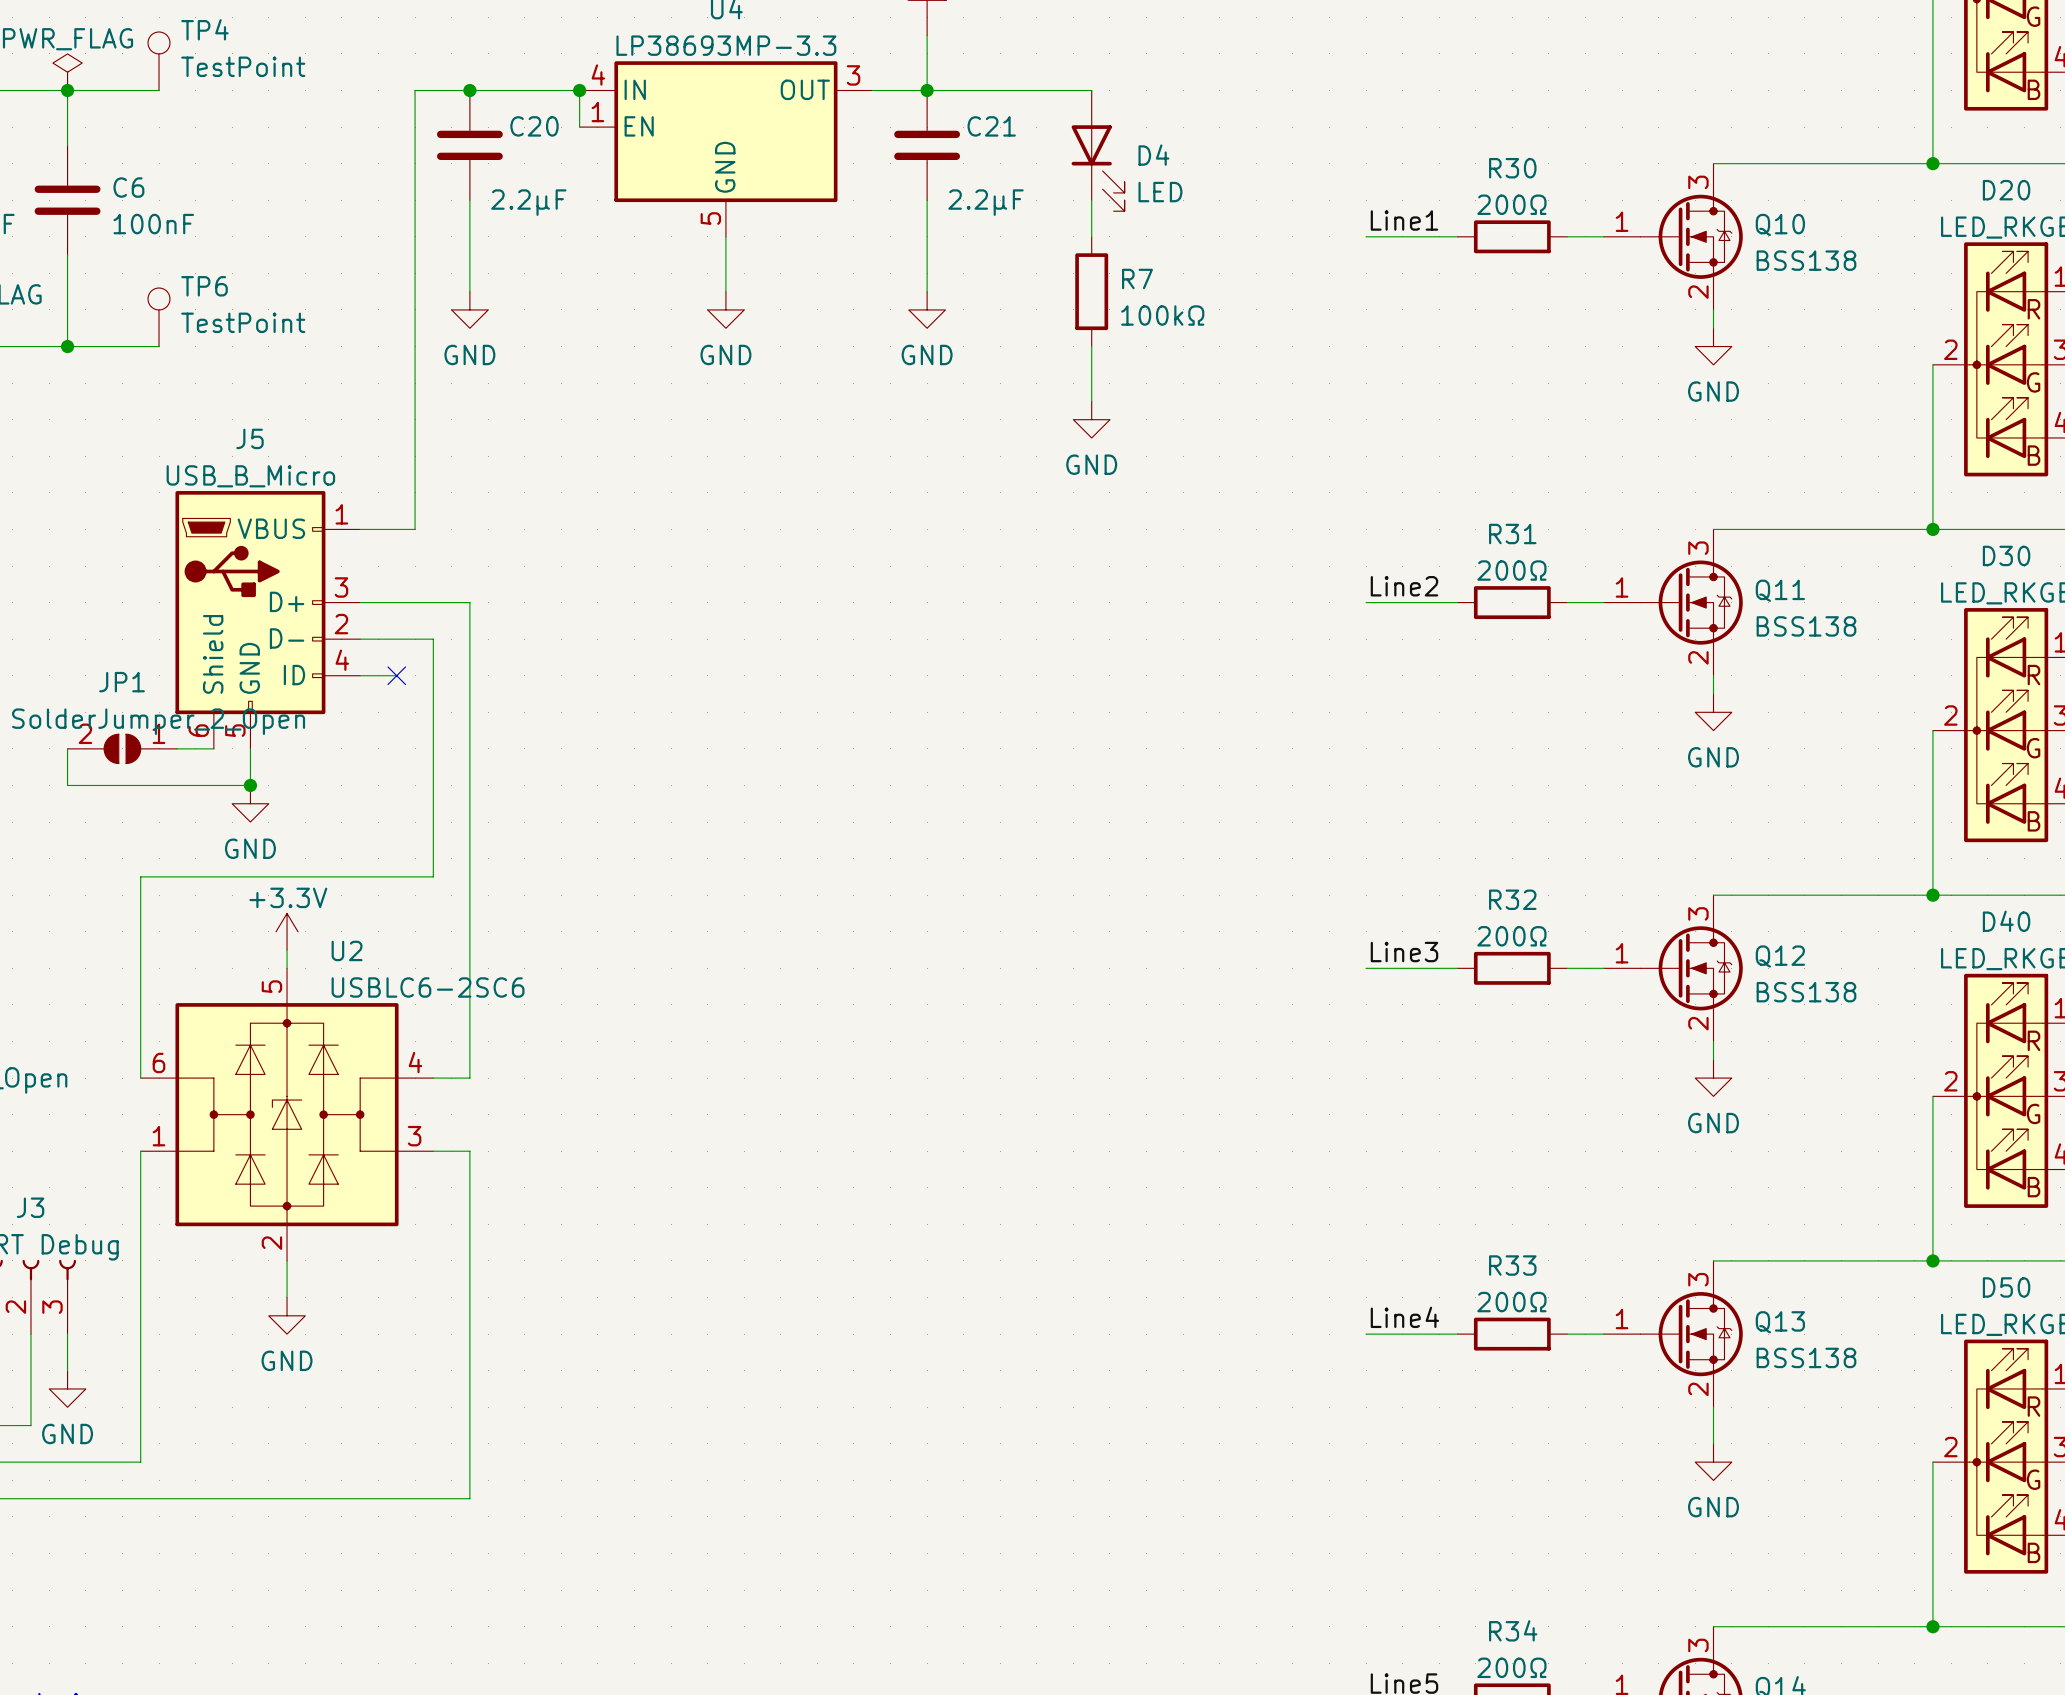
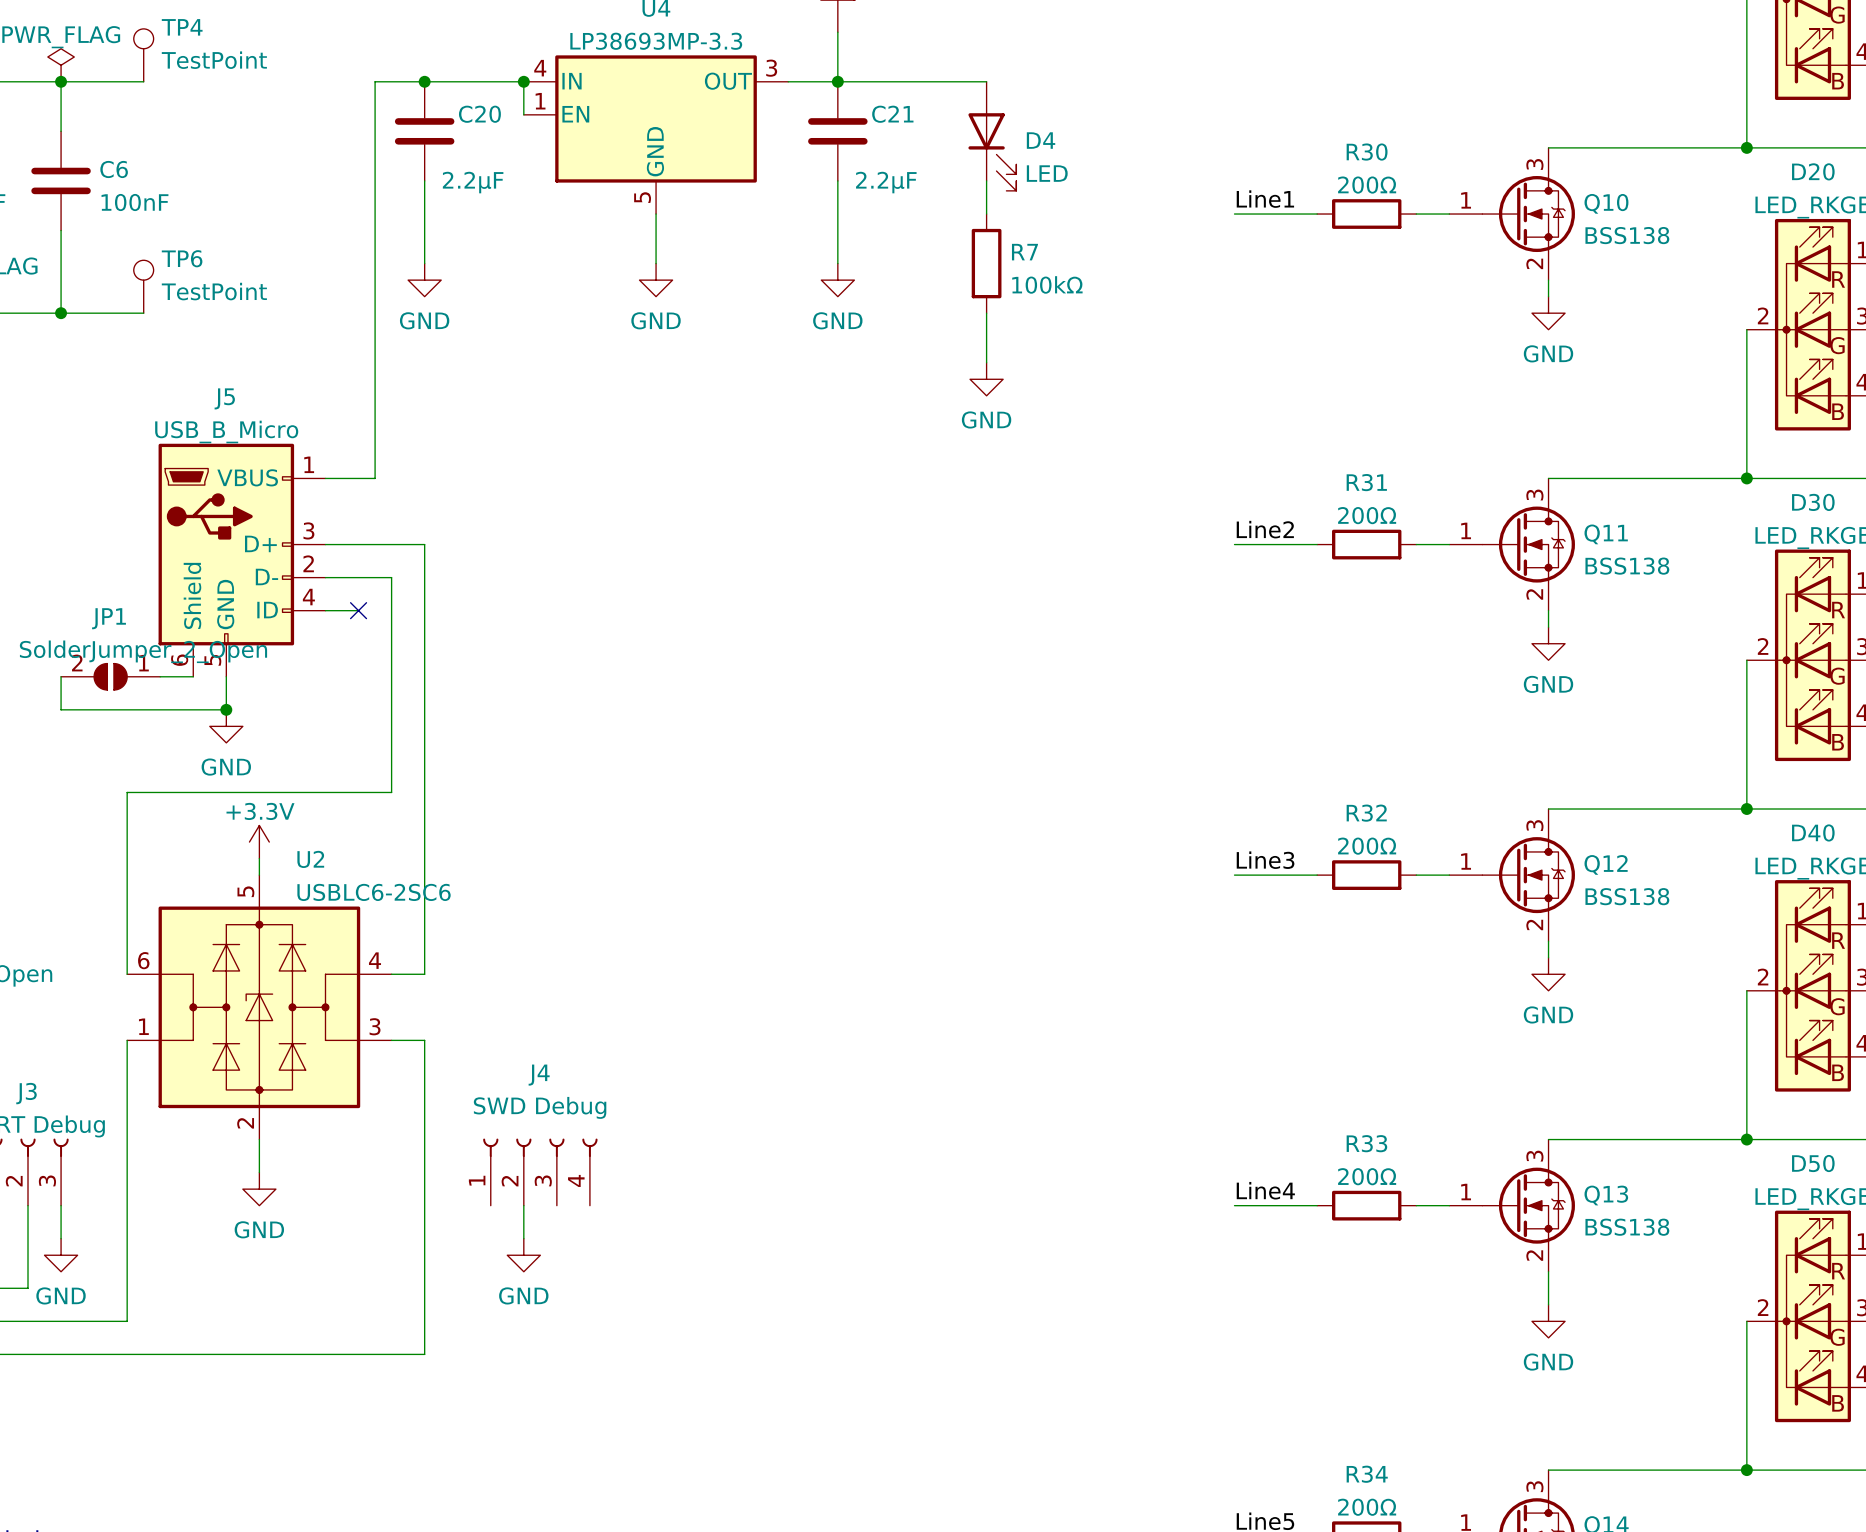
J4: none -> SWD Debug (540, 1172)
wire: none -> (523, 1205) (523, 1238)
power symbol: none -> GND (523, 1255)

